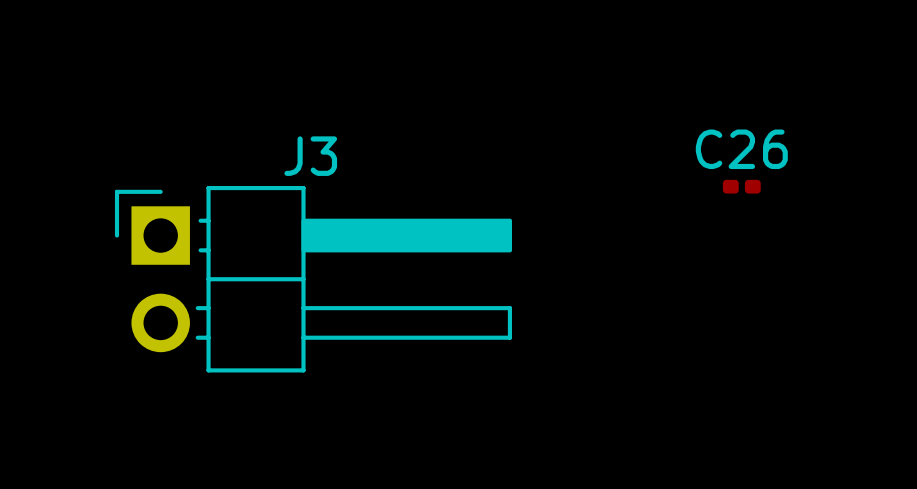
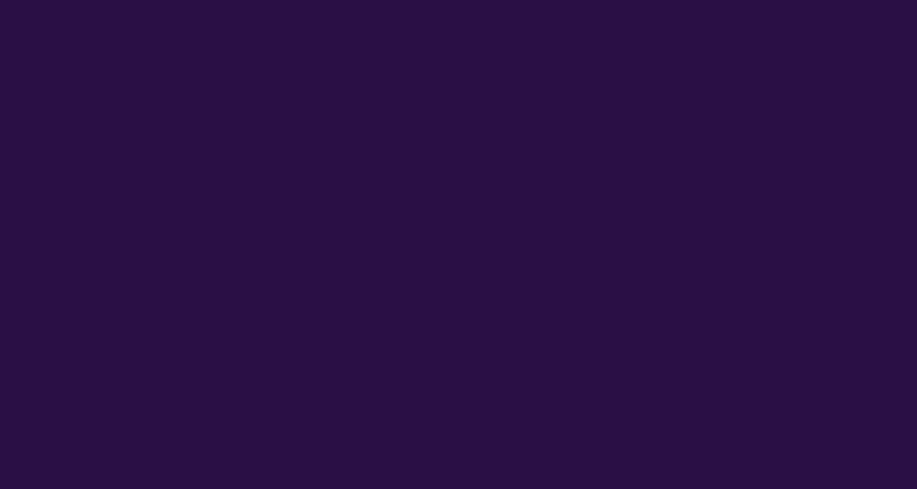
C26: (741, 186) -> none
J3: (313, 279) -> none

